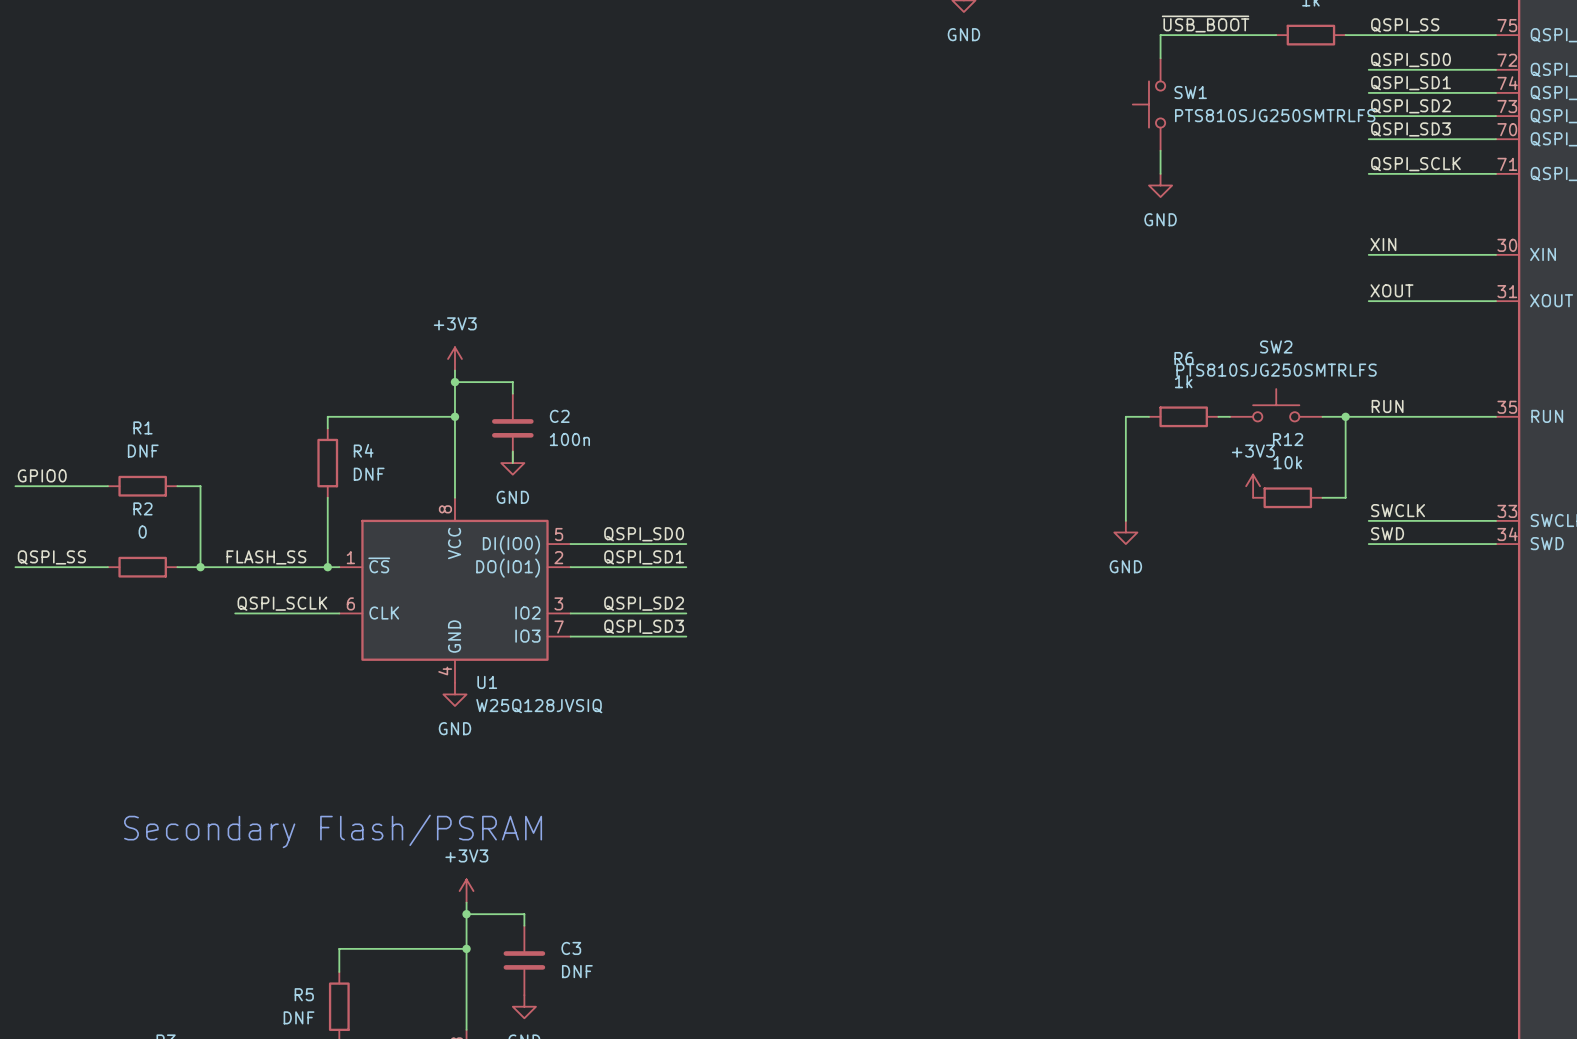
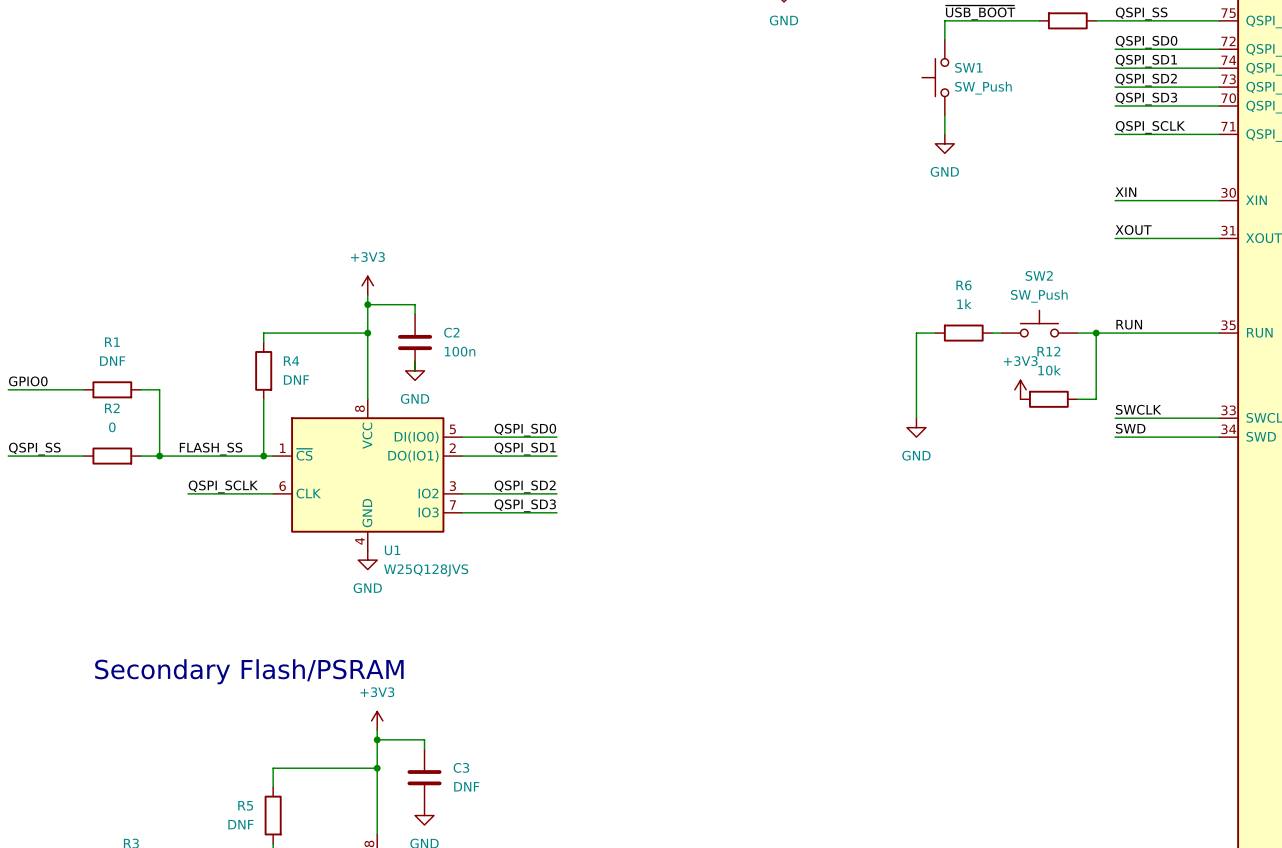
SW1 value: PTS810SJG250SMTRLFS (1275, 115) -> SW_Push (983, 88)
SW2 value: PTS810SJG250SMTRLFS (1276, 370) -> SW_Push (1039, 296)
U1 value: W25Q128JVSIQ (539, 706) -> W25Q128JVS (426, 570)

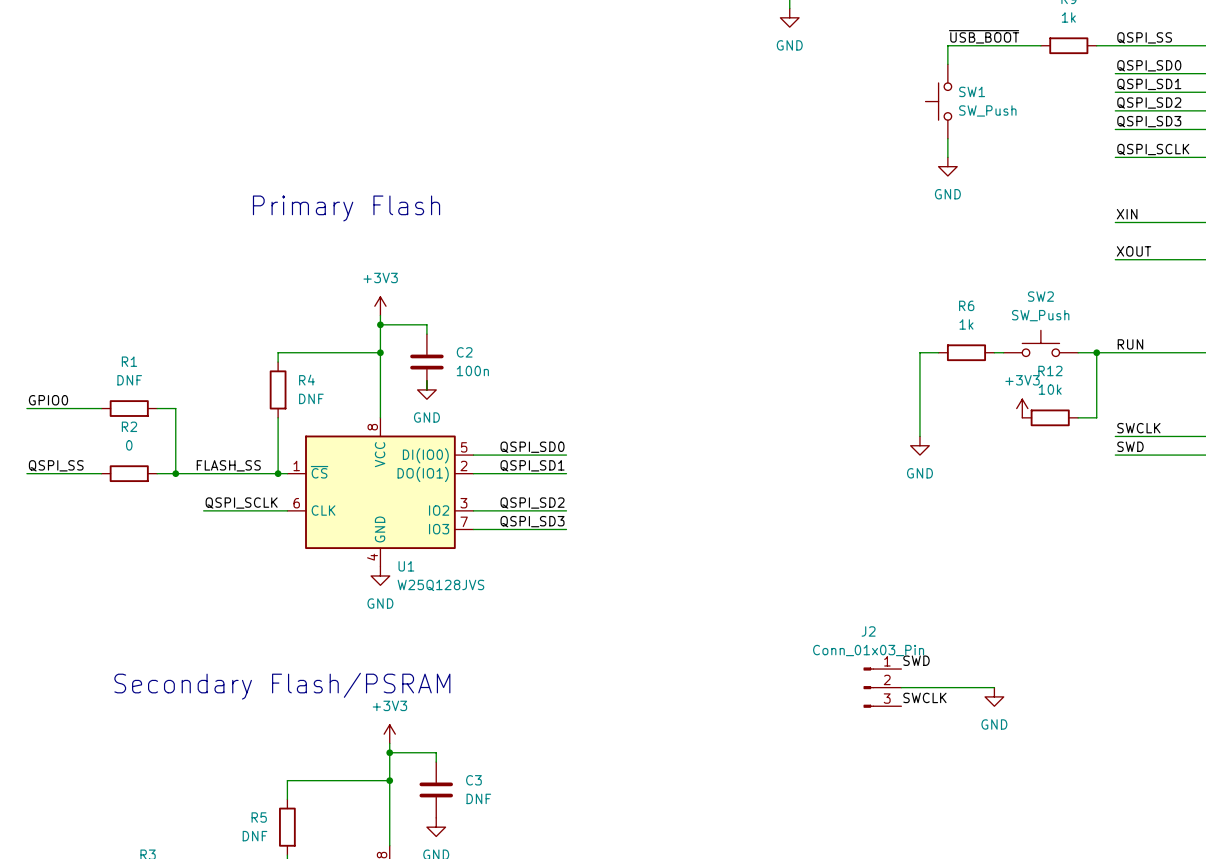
text: none -> Primary Flash (346, 208)
label: none -> SWD (916, 660)
J2: none -> Conn_01x03_Pin (882, 687)
wire: none -> (901, 687) (994, 687)
power symbol: none -> GND (994, 696)
label: none -> SWCLK (924, 697)

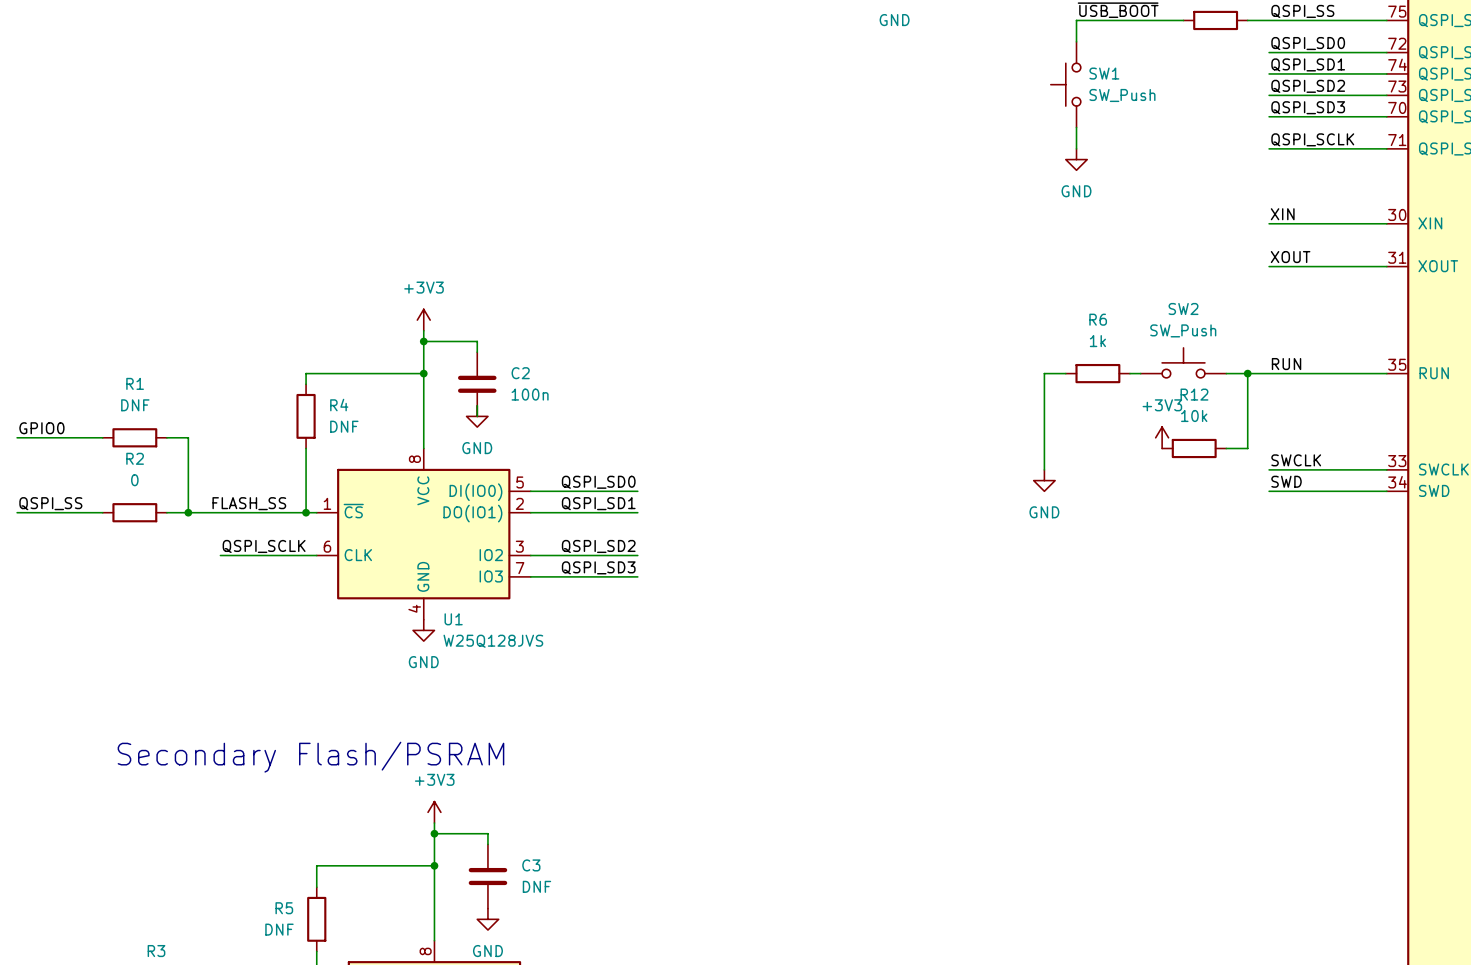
text: Primary Flash (346, 208) -> none
label: SWD (916, 660) -> none
J2: Conn_01x03_Pin (882, 687) -> none
wire: (901, 687) (994, 687) -> none
power symbol: GND (994, 696) -> none
label: SWCLK (924, 697) -> none

